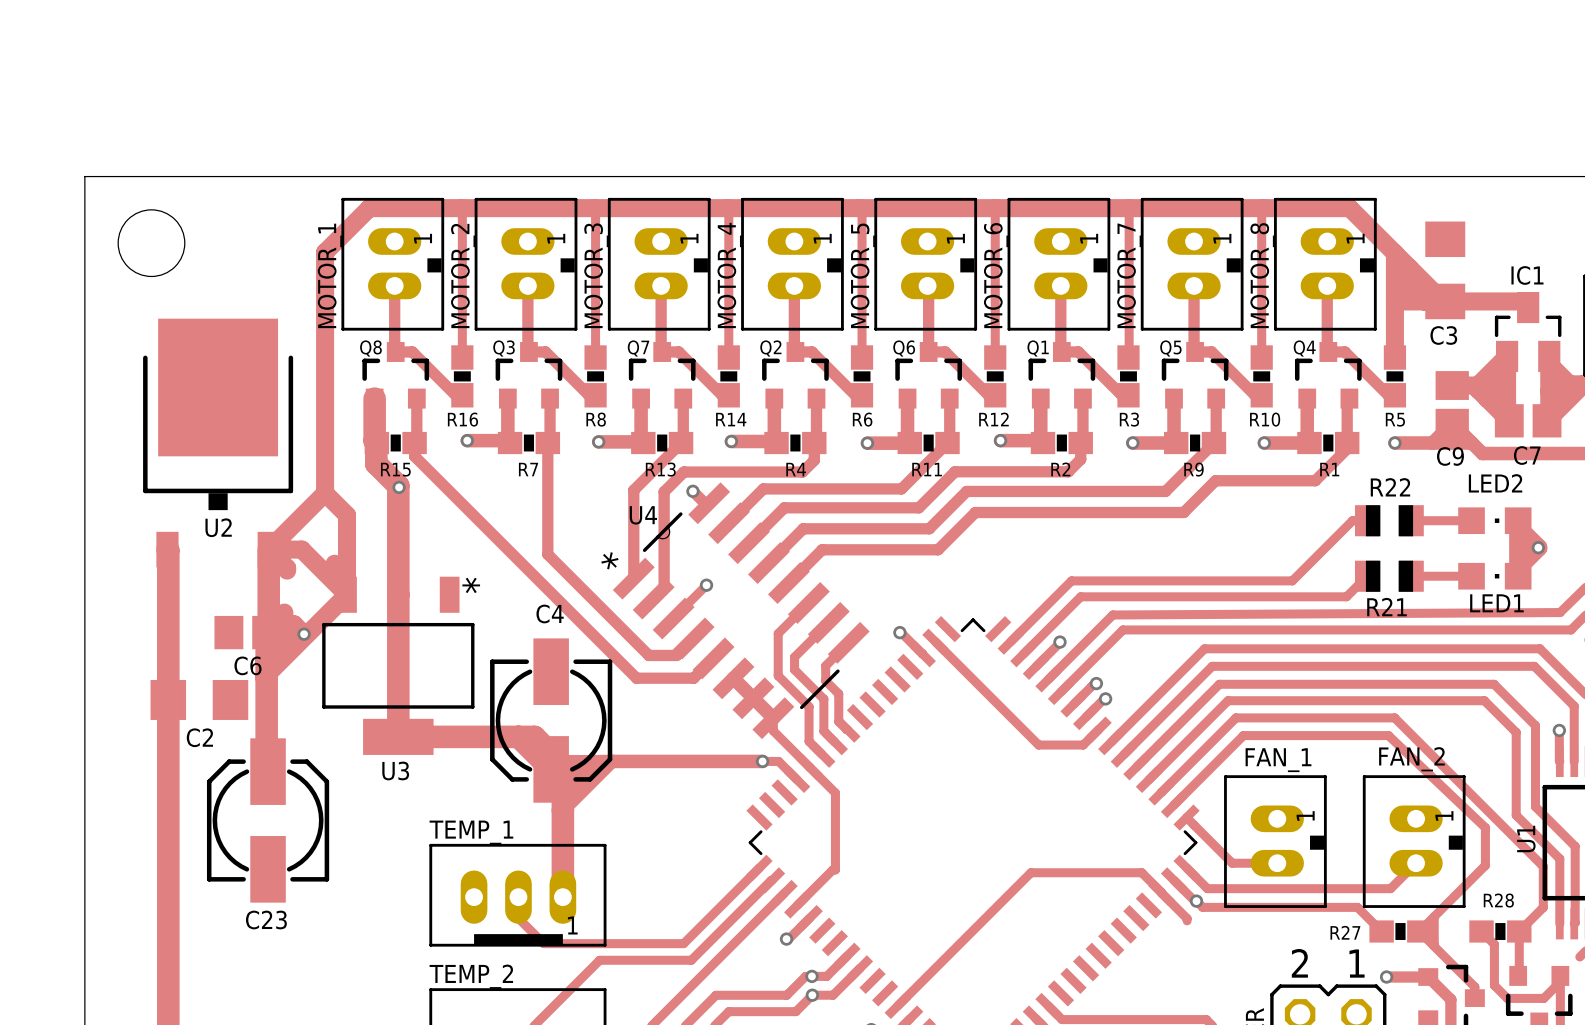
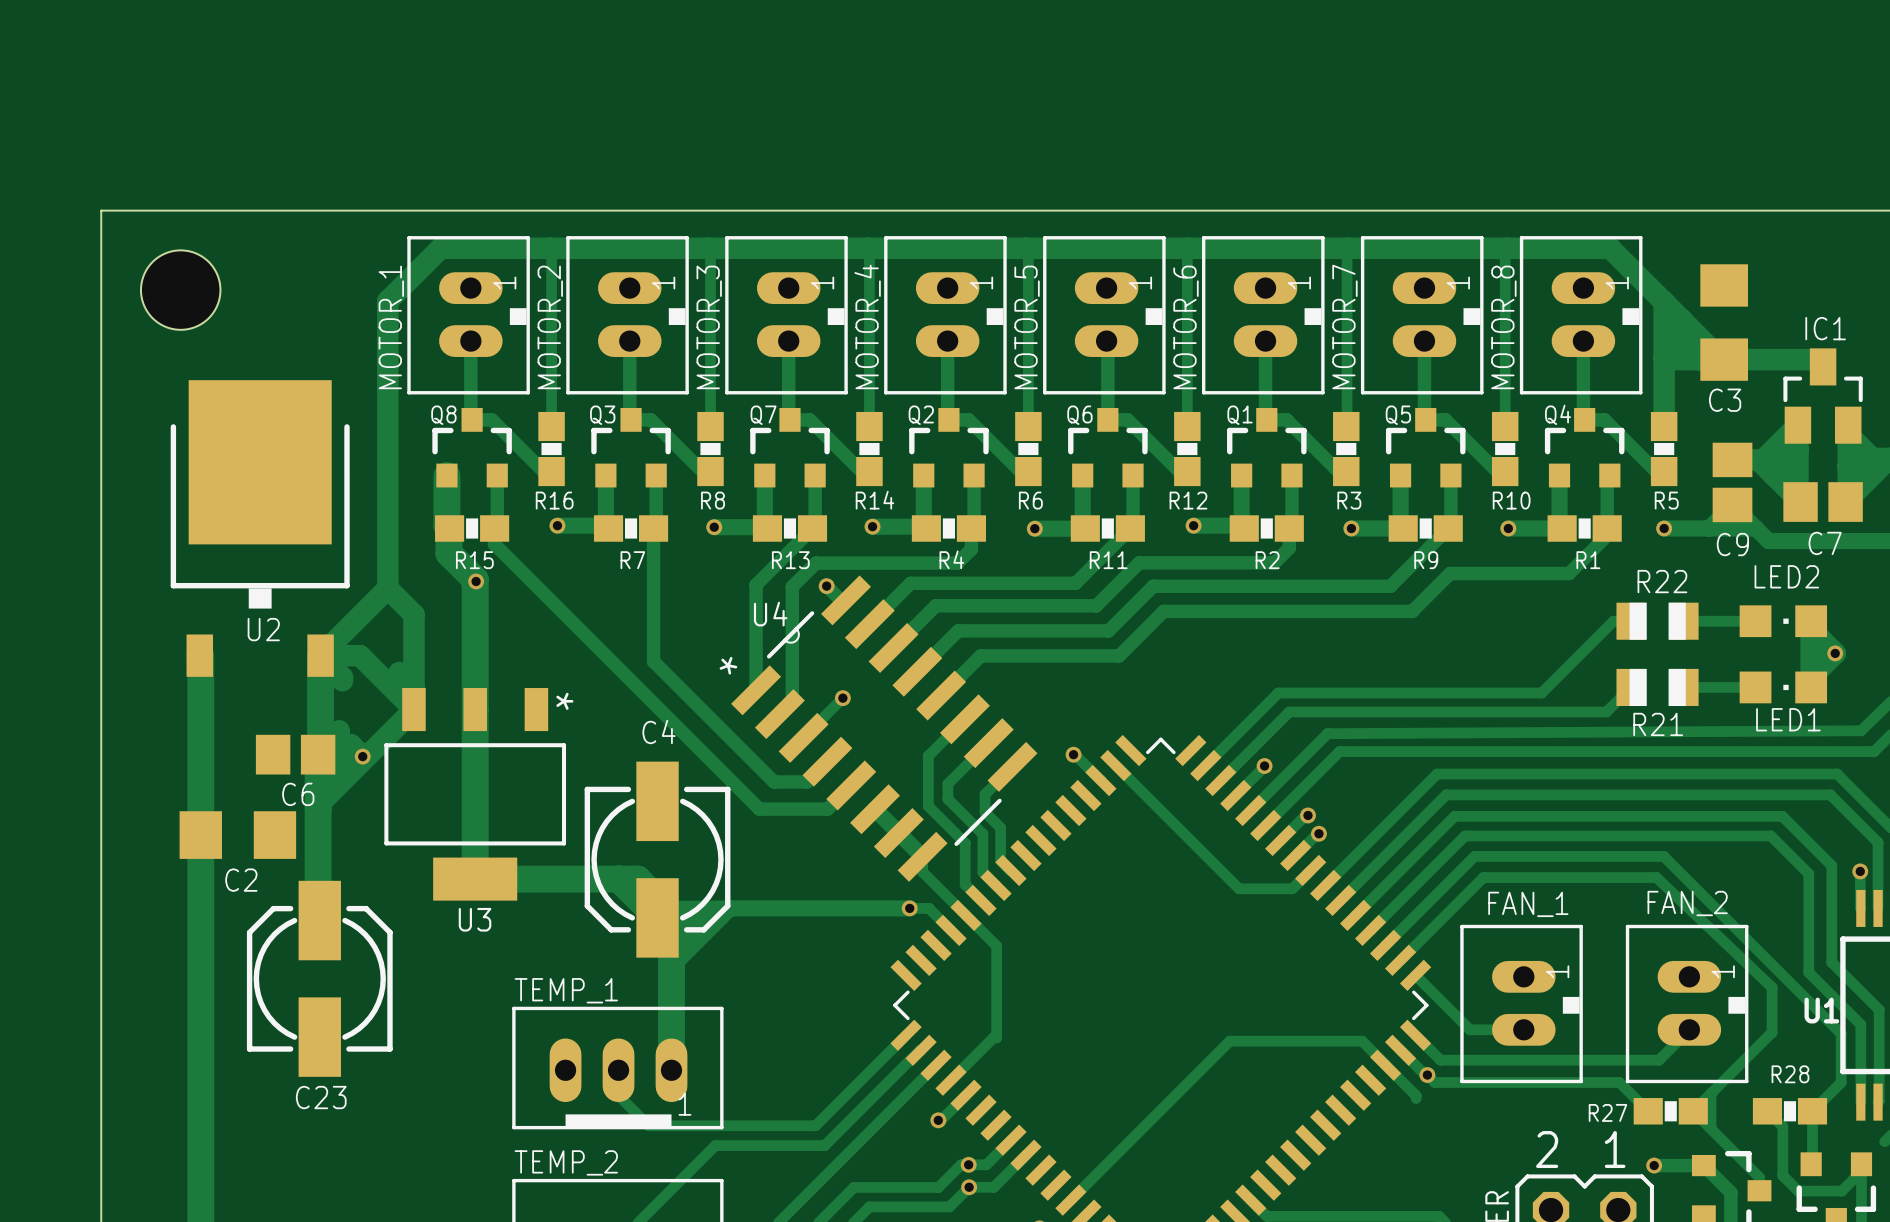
text: U1 (1526, 839) -> none
U1 name: none -> U1 (1821, 1010)

